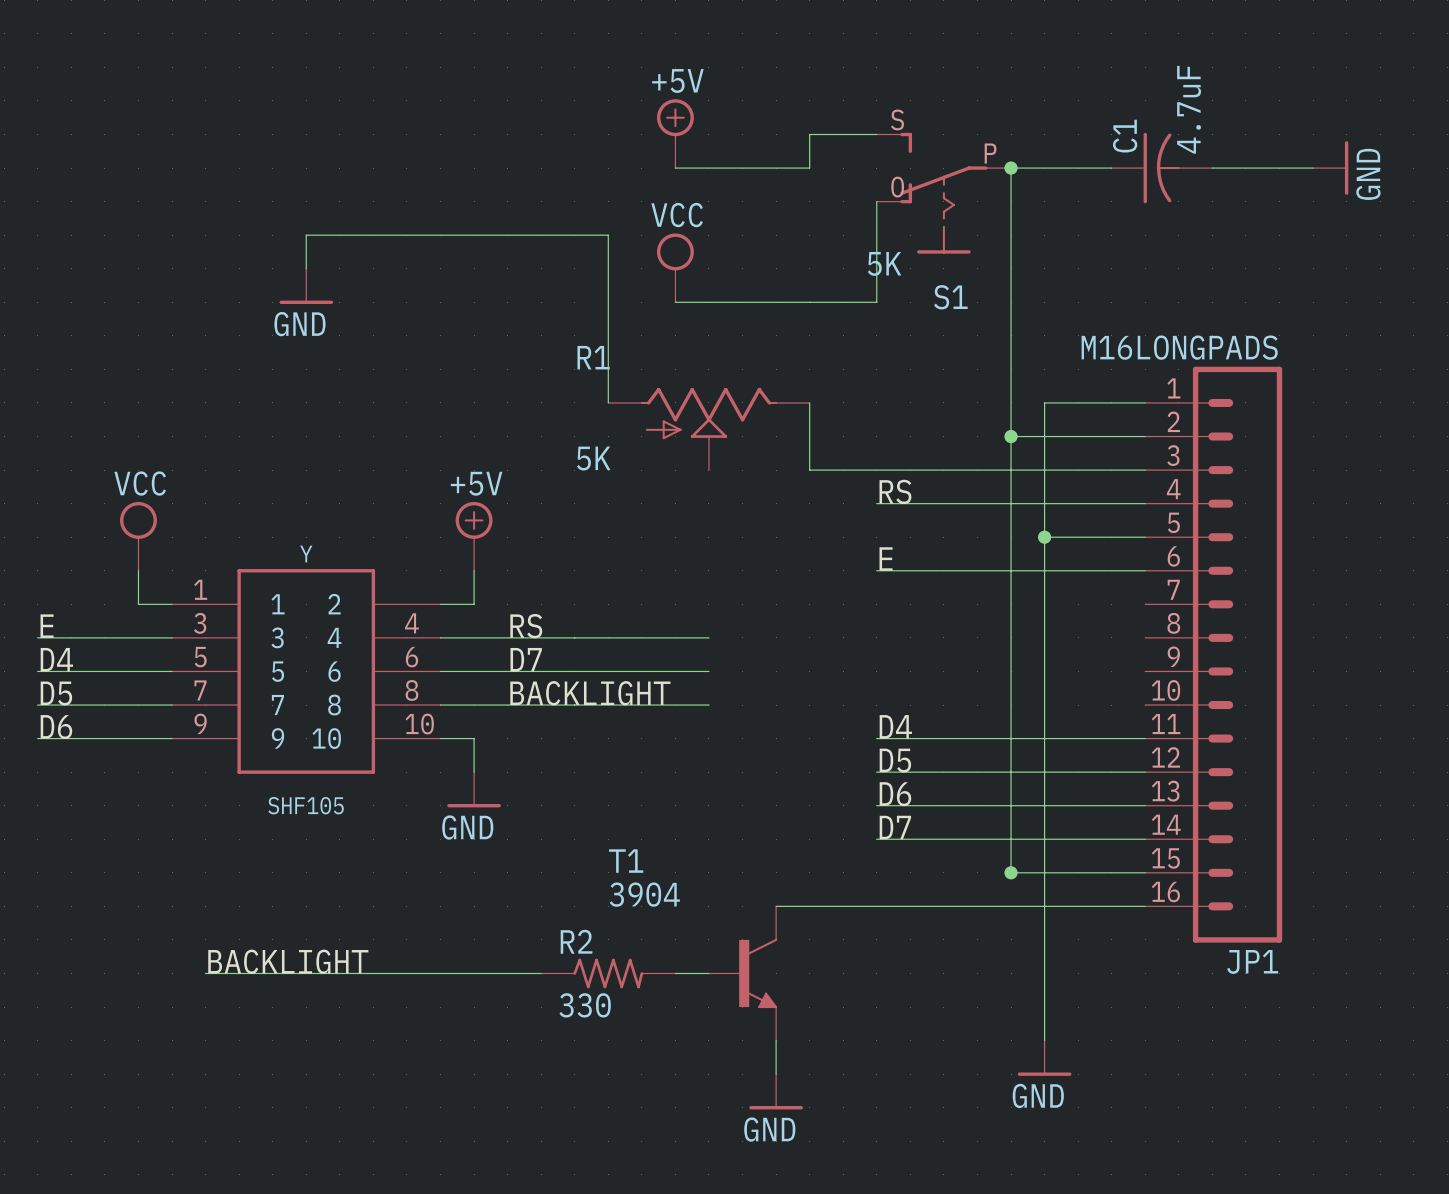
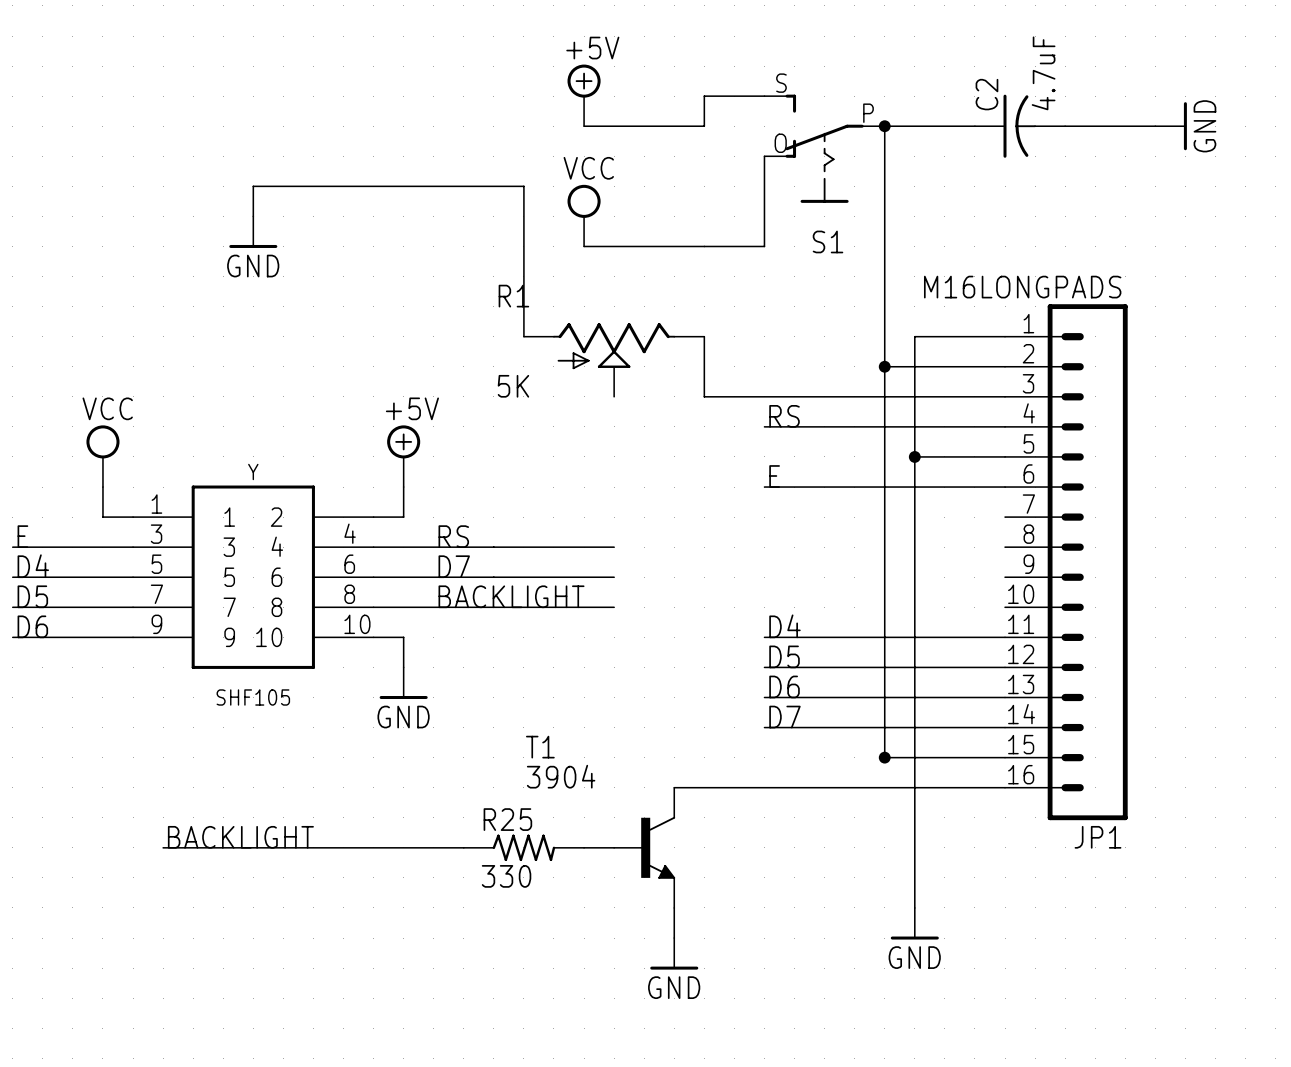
C1 name: C1 (1125, 136) -> C2 (986, 94)
S1 value: 5K (884, 263) -> none
R2 name: R2 (576, 941) -> R25 (507, 819)

